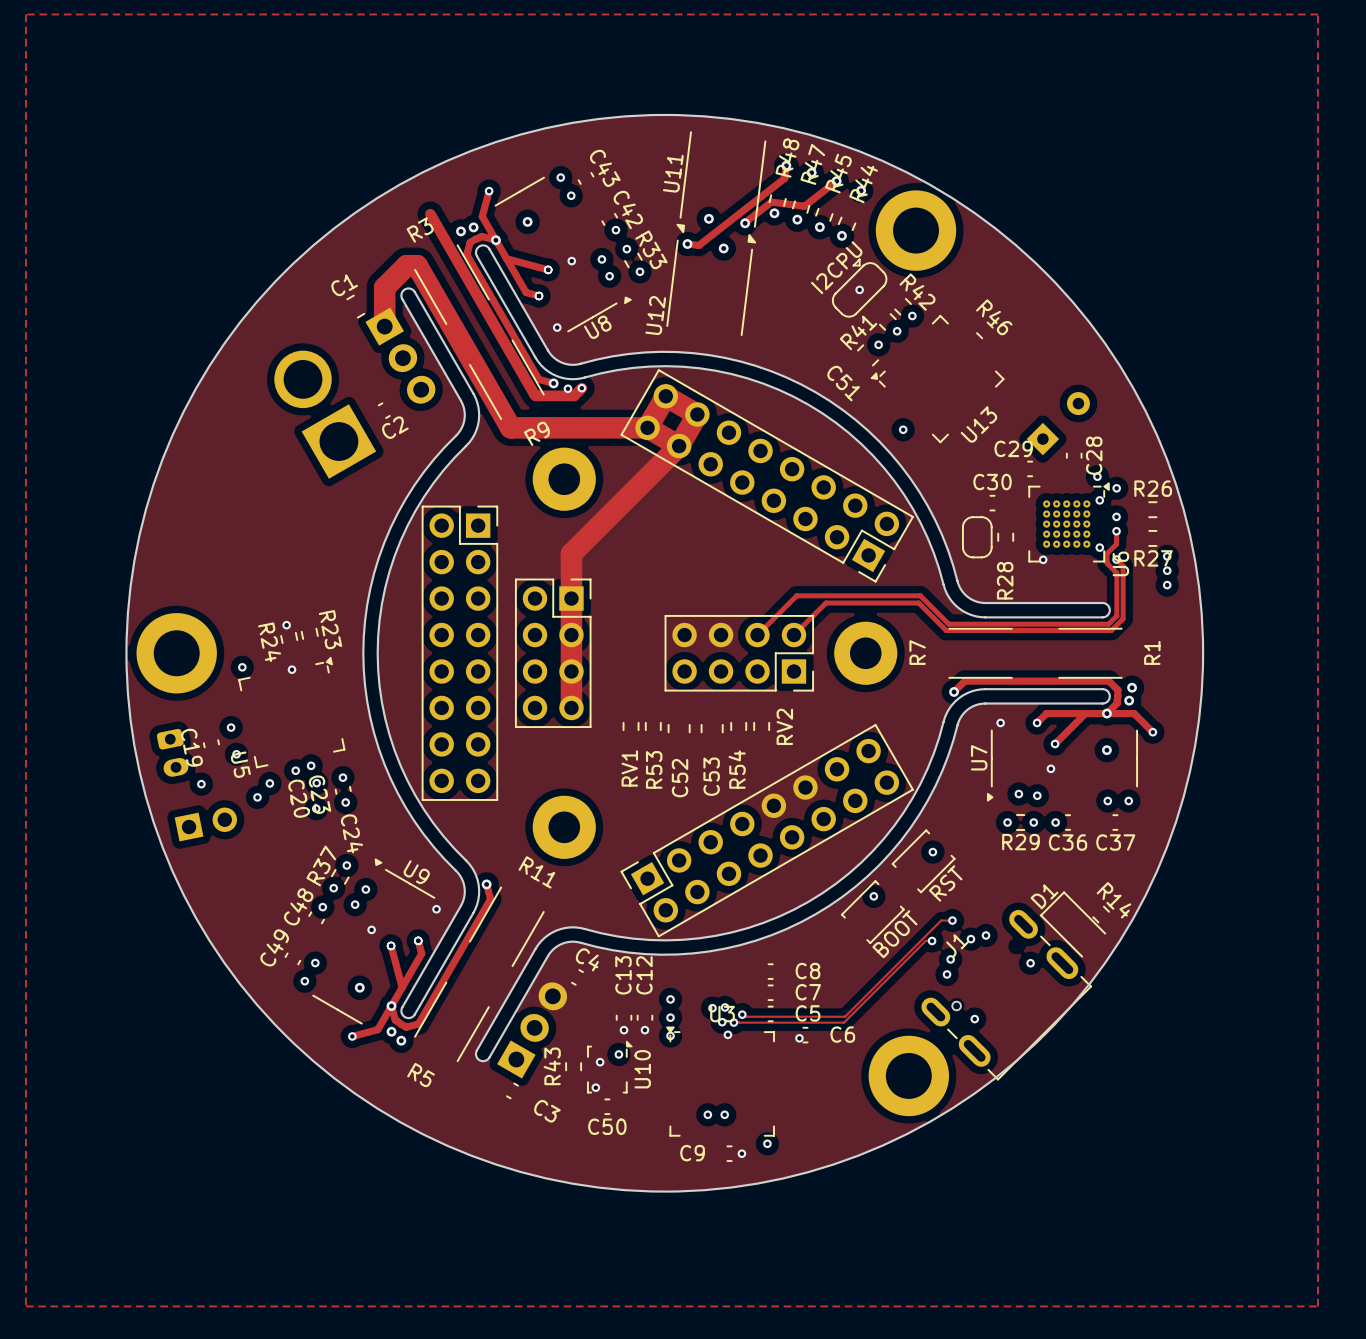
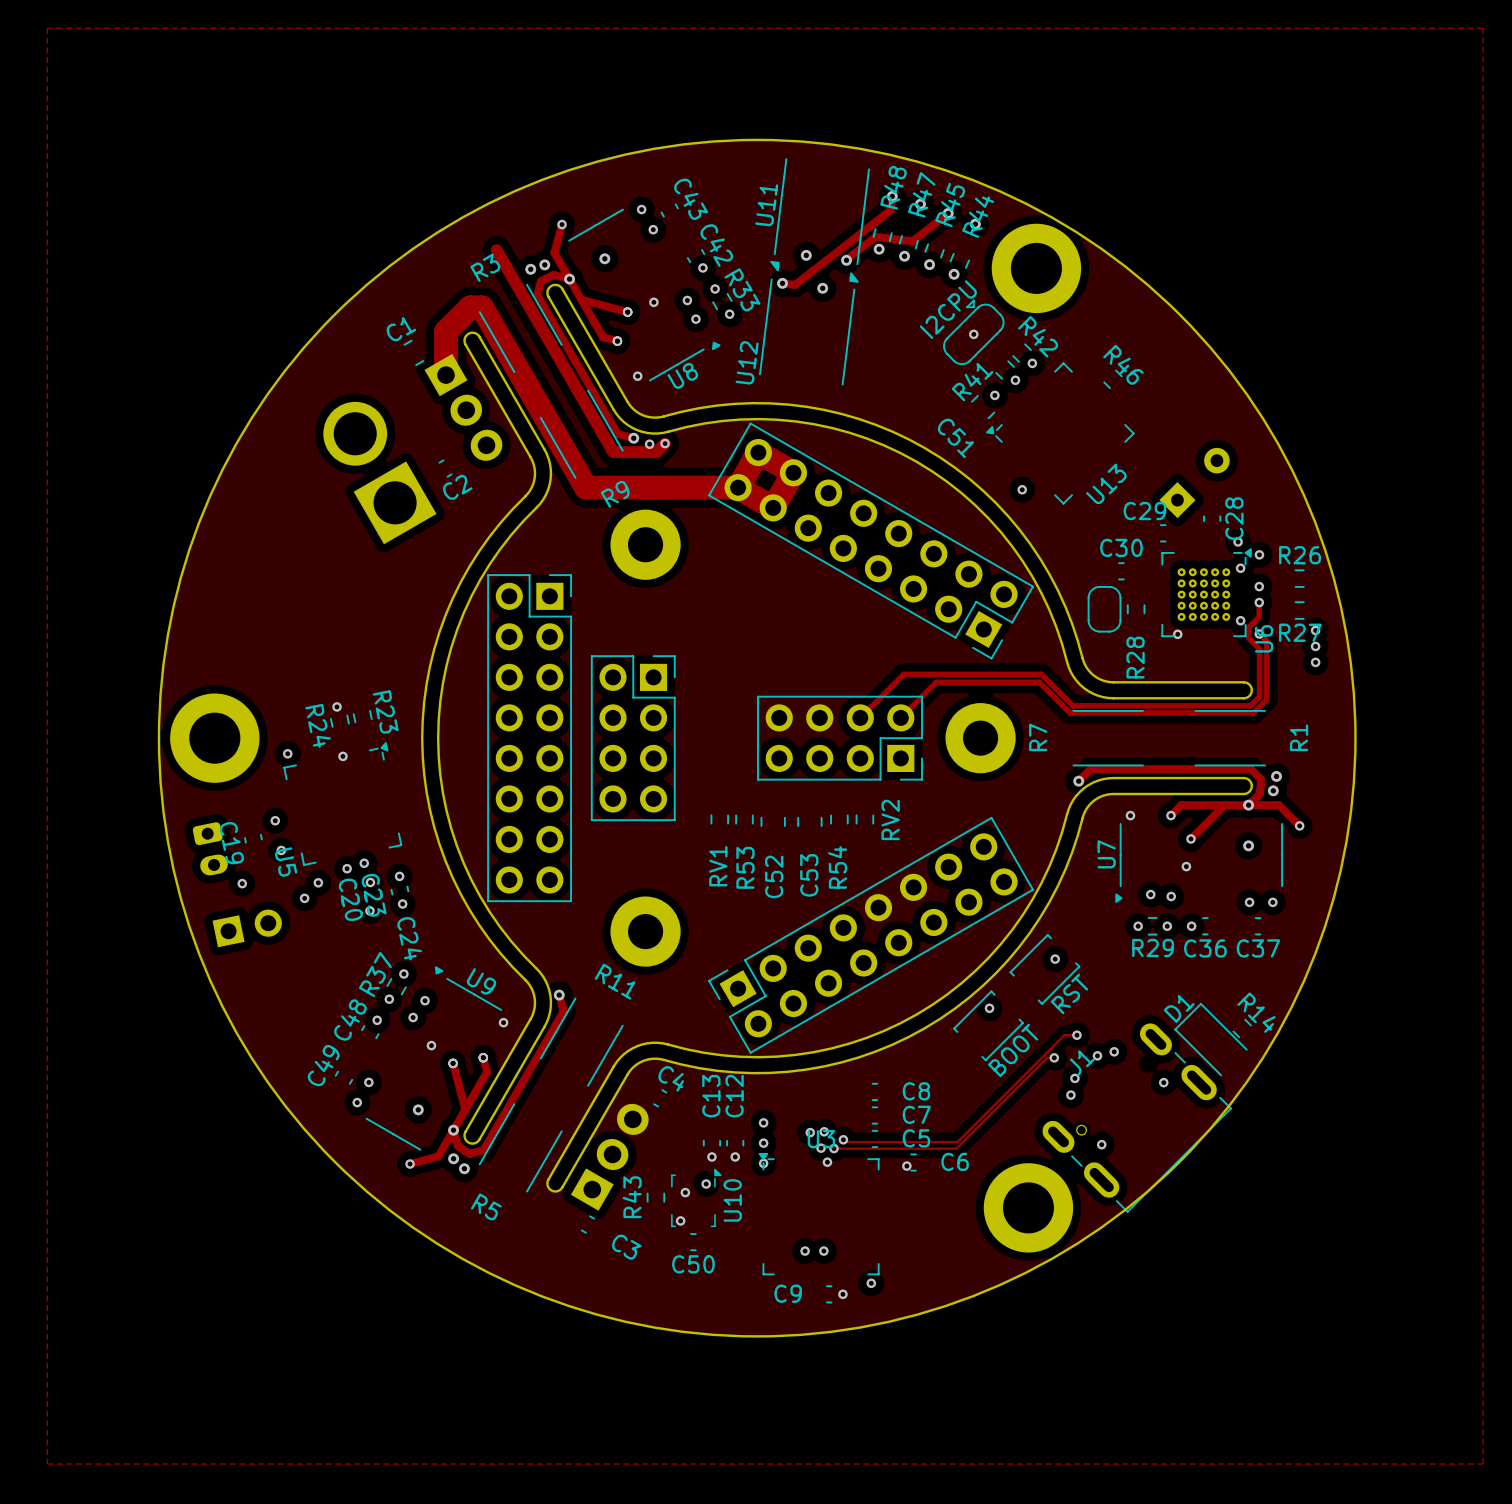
track: (679, 446) (571, 553) (571, 707) -> none

